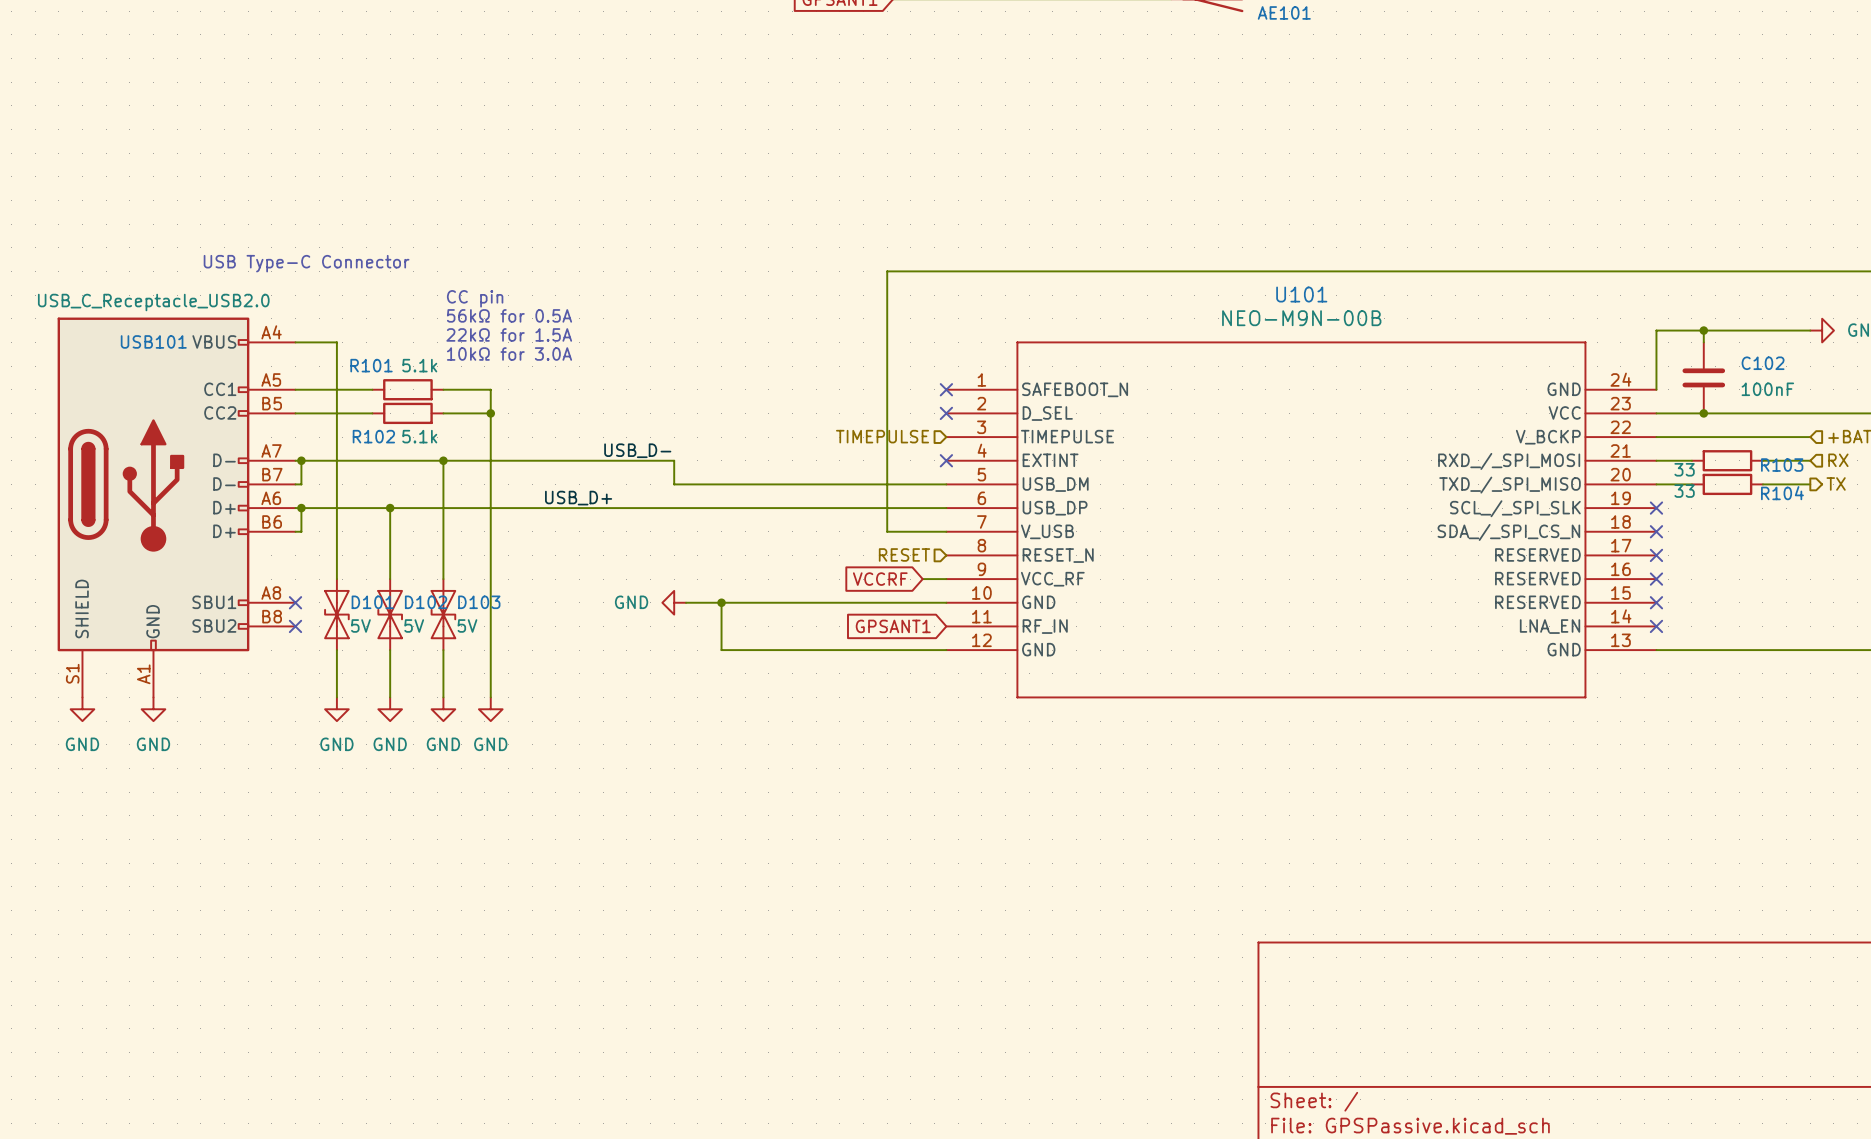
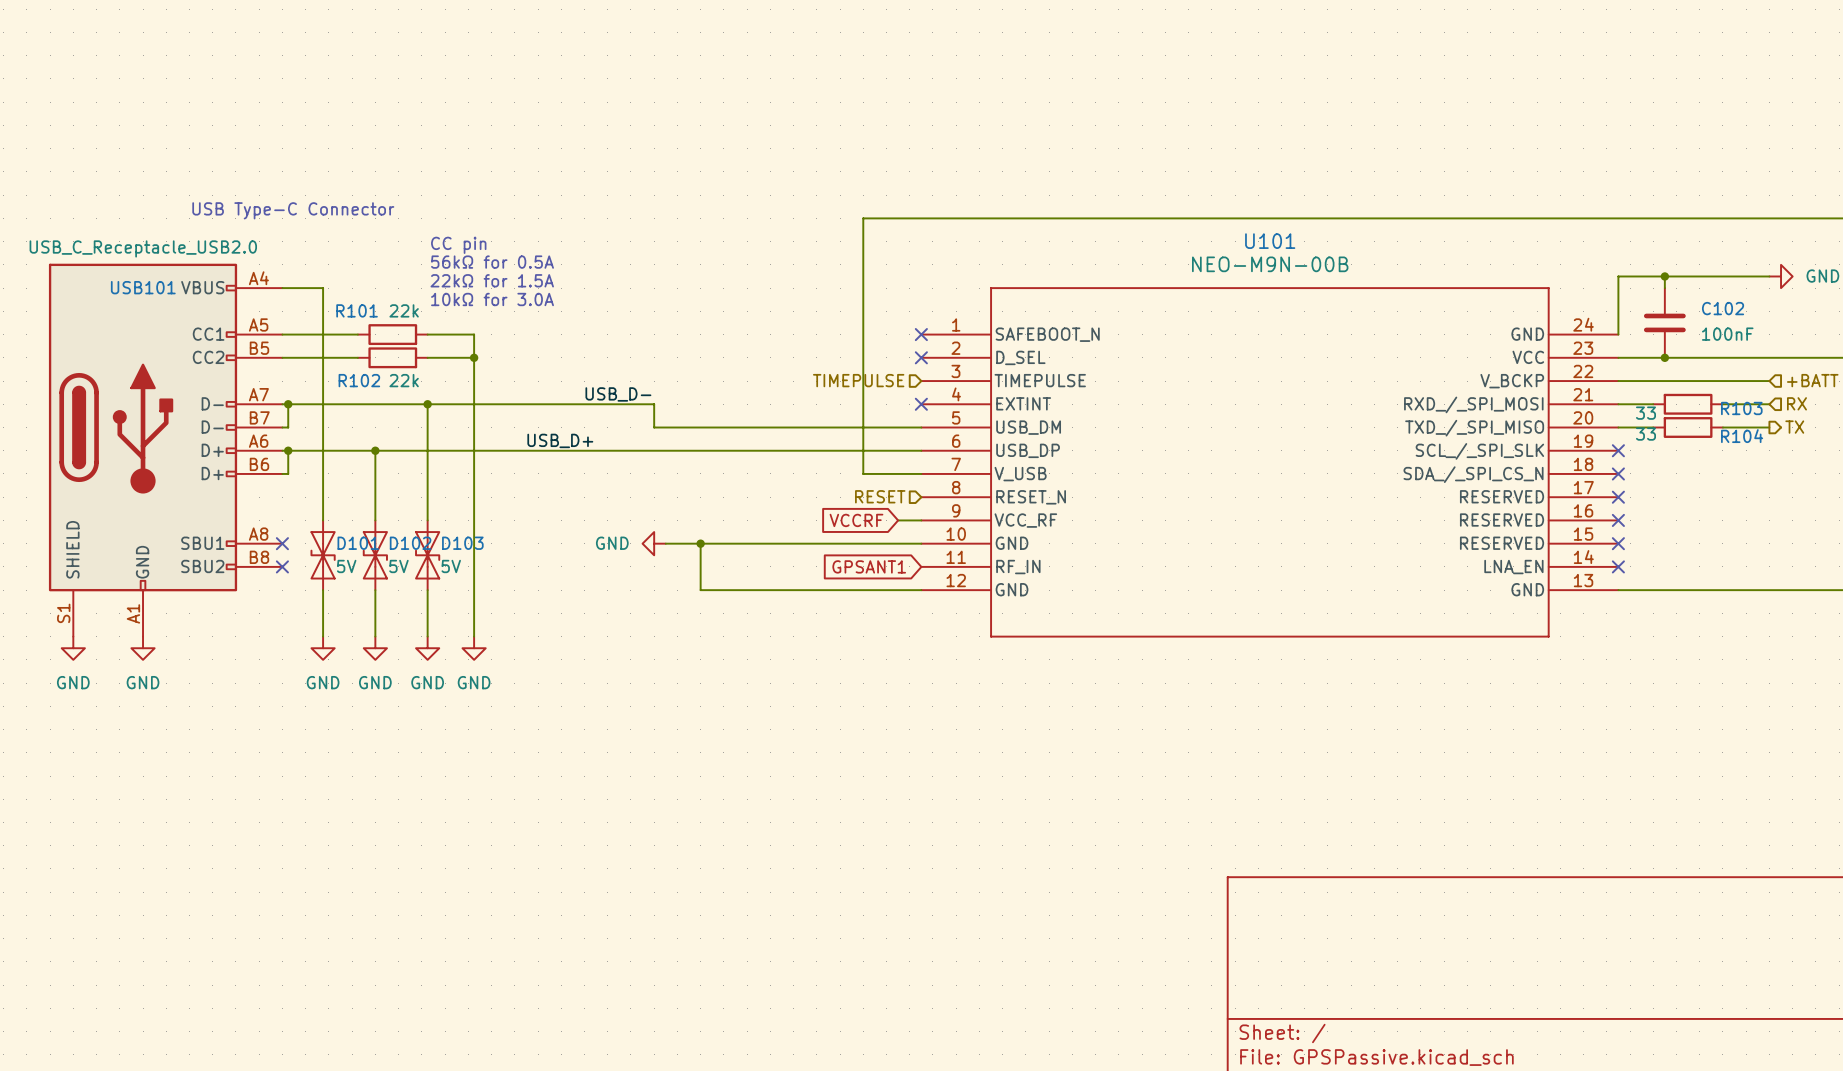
R101 value: 5.1k (419, 365) -> 22k (404, 310)
R102 value: 5.1k (419, 436) -> 22k (404, 380)

